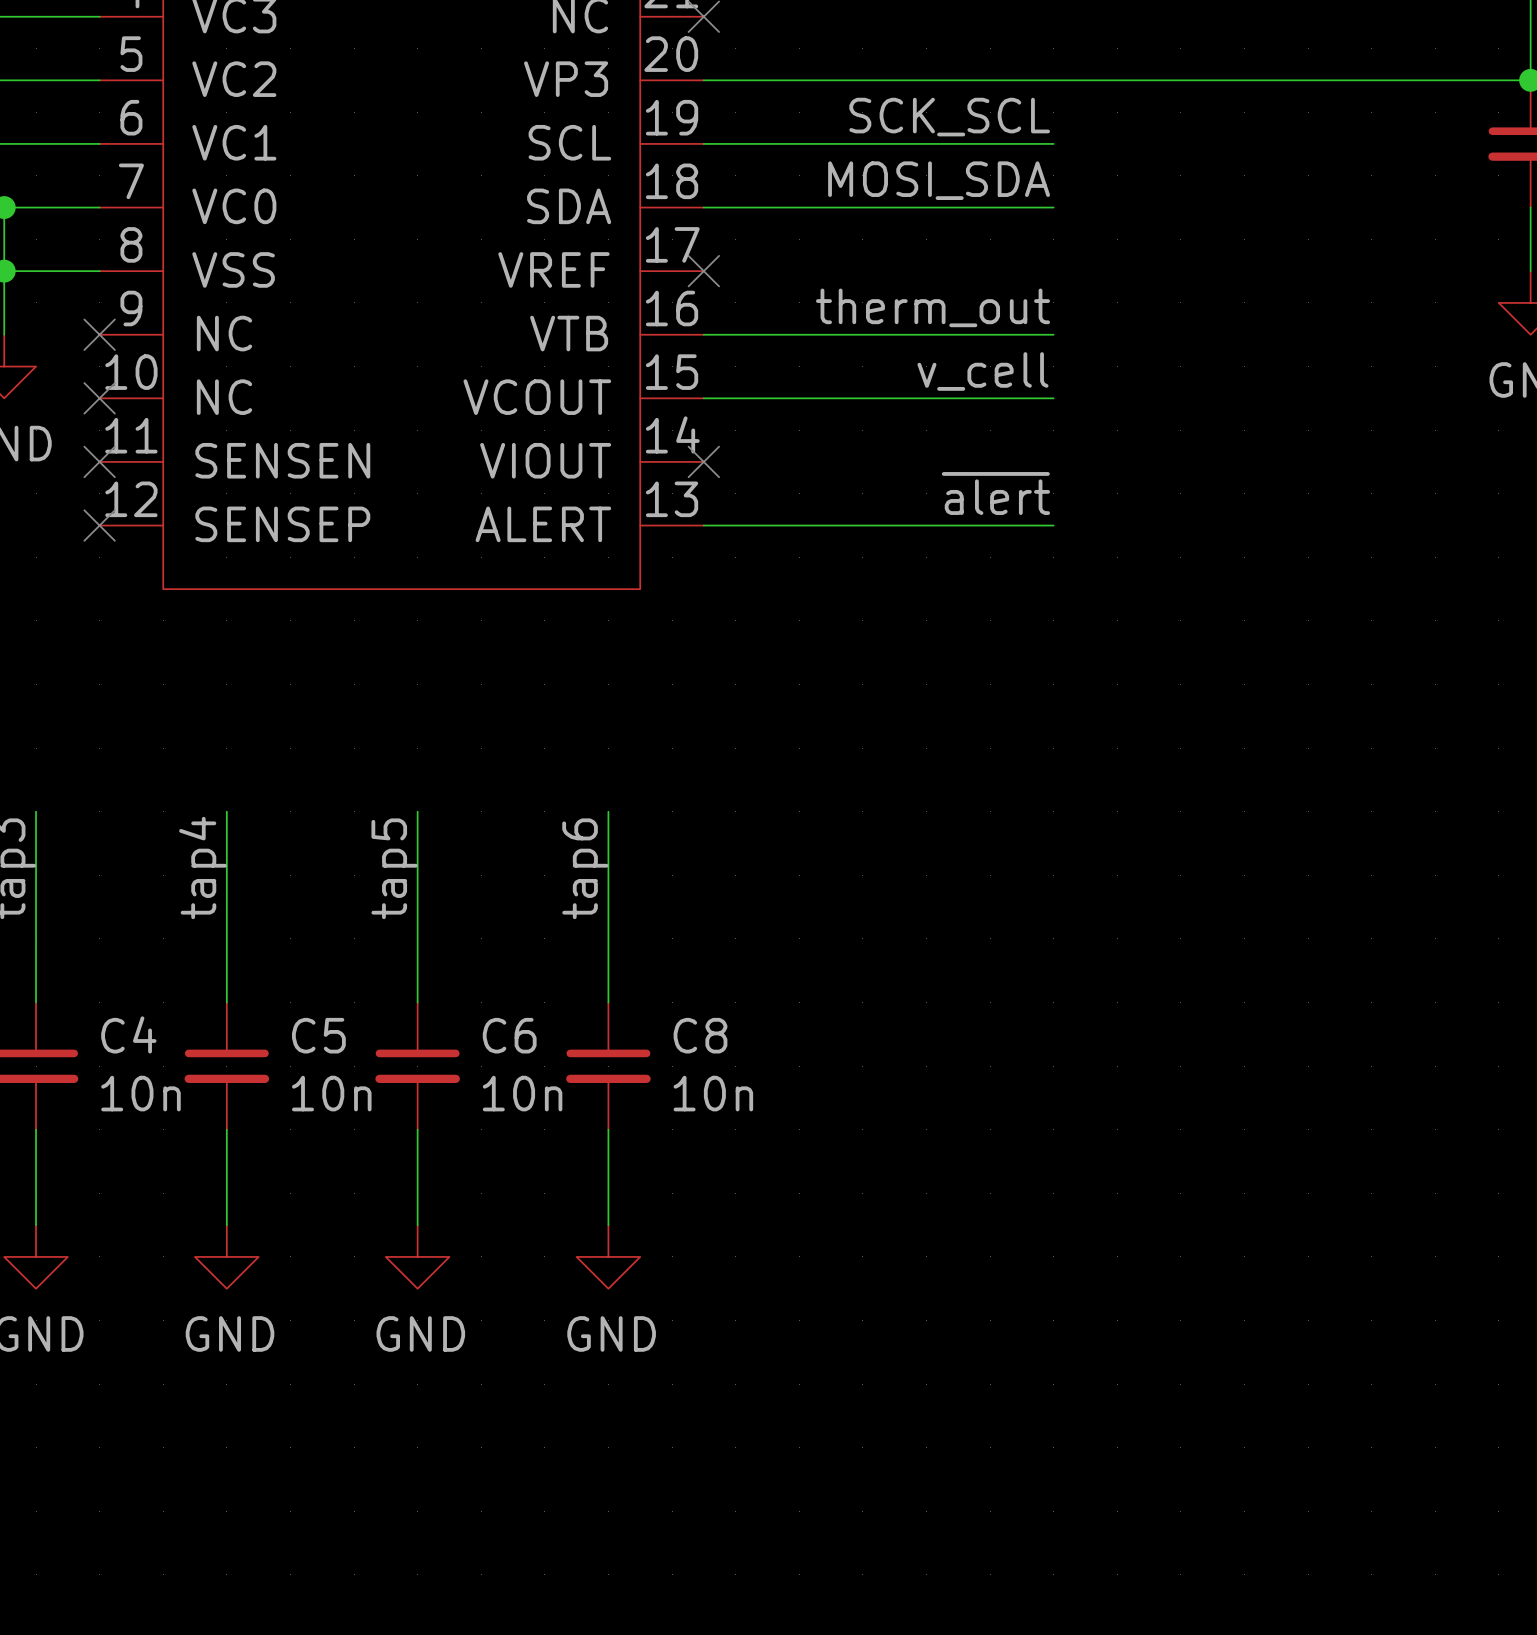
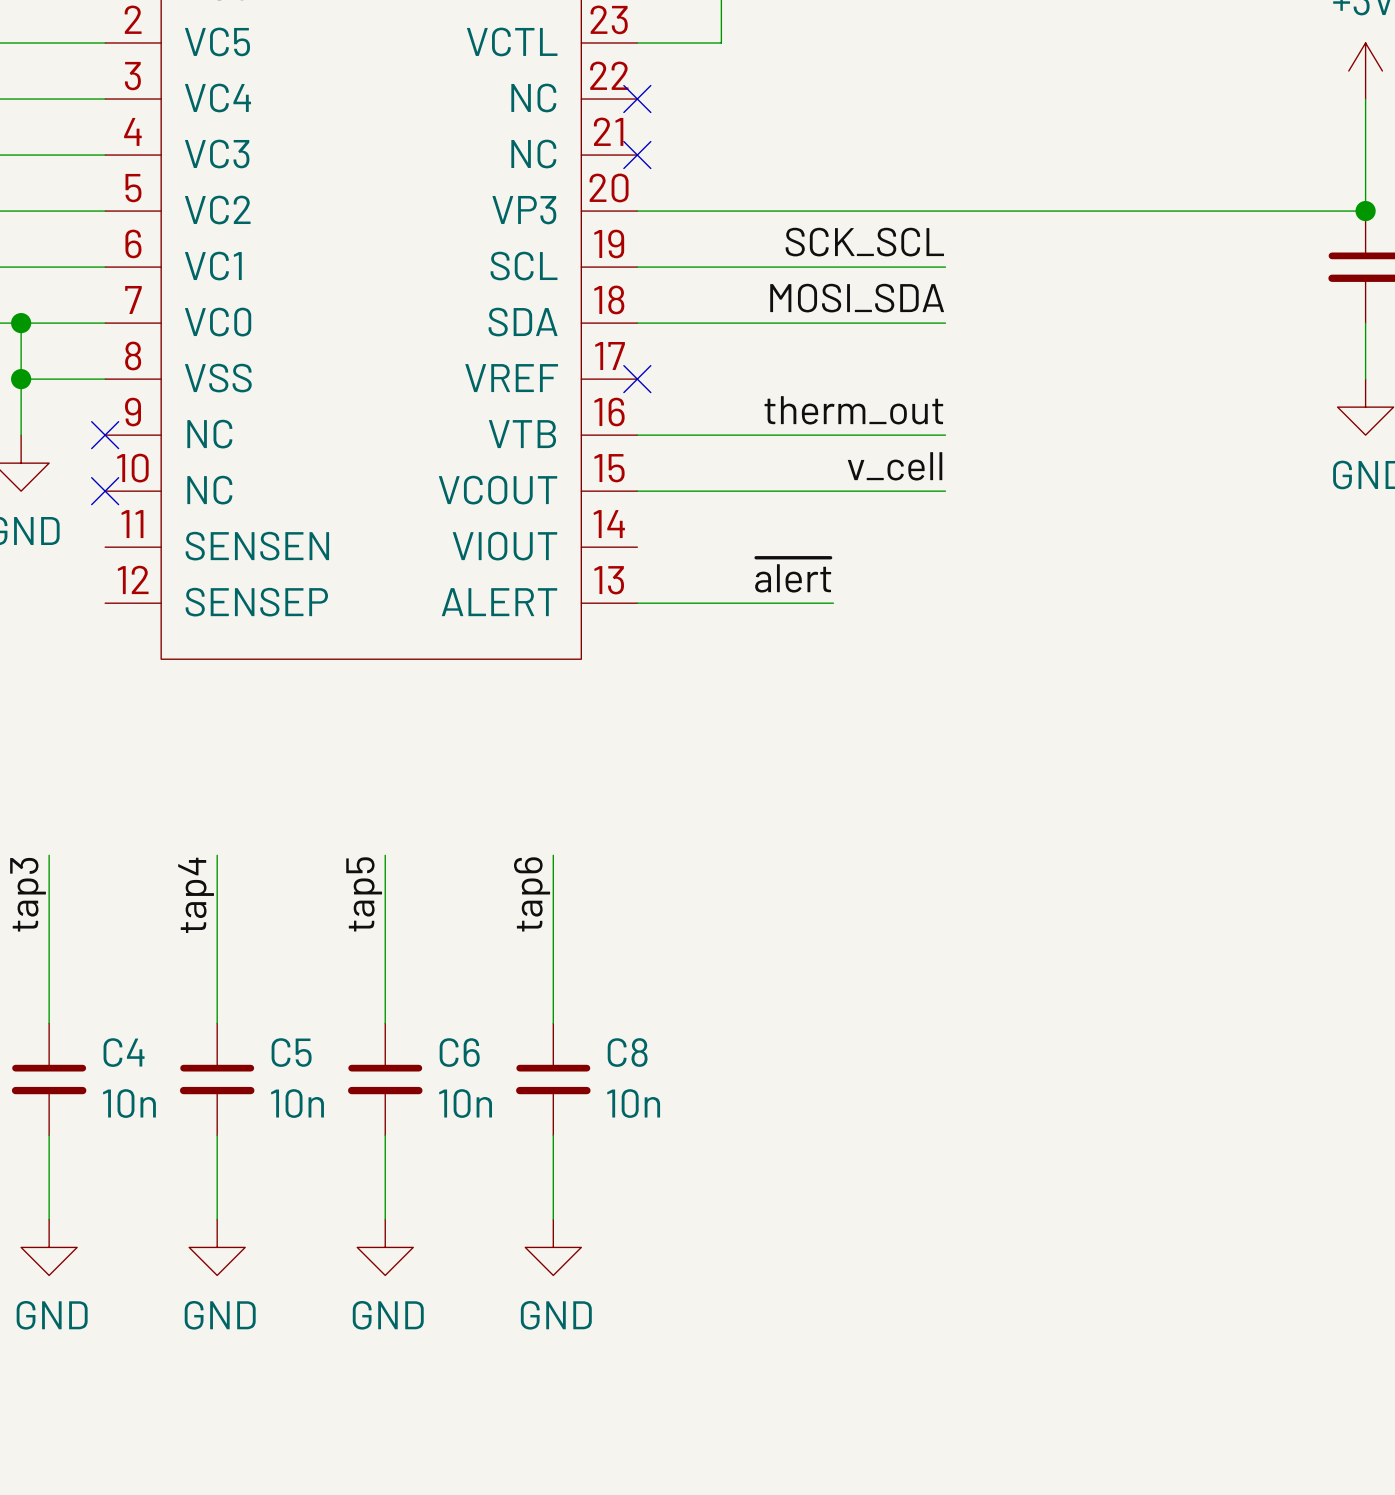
no-connect mark: (99, 461) -> none
no-connect mark: (703, 461) -> none
label position: ~{alert} (995, 493) -> ~{alert} (793, 575)
no-connect mark: (99, 525) -> none
wire: (926, 525) (1053, 525) -> none

